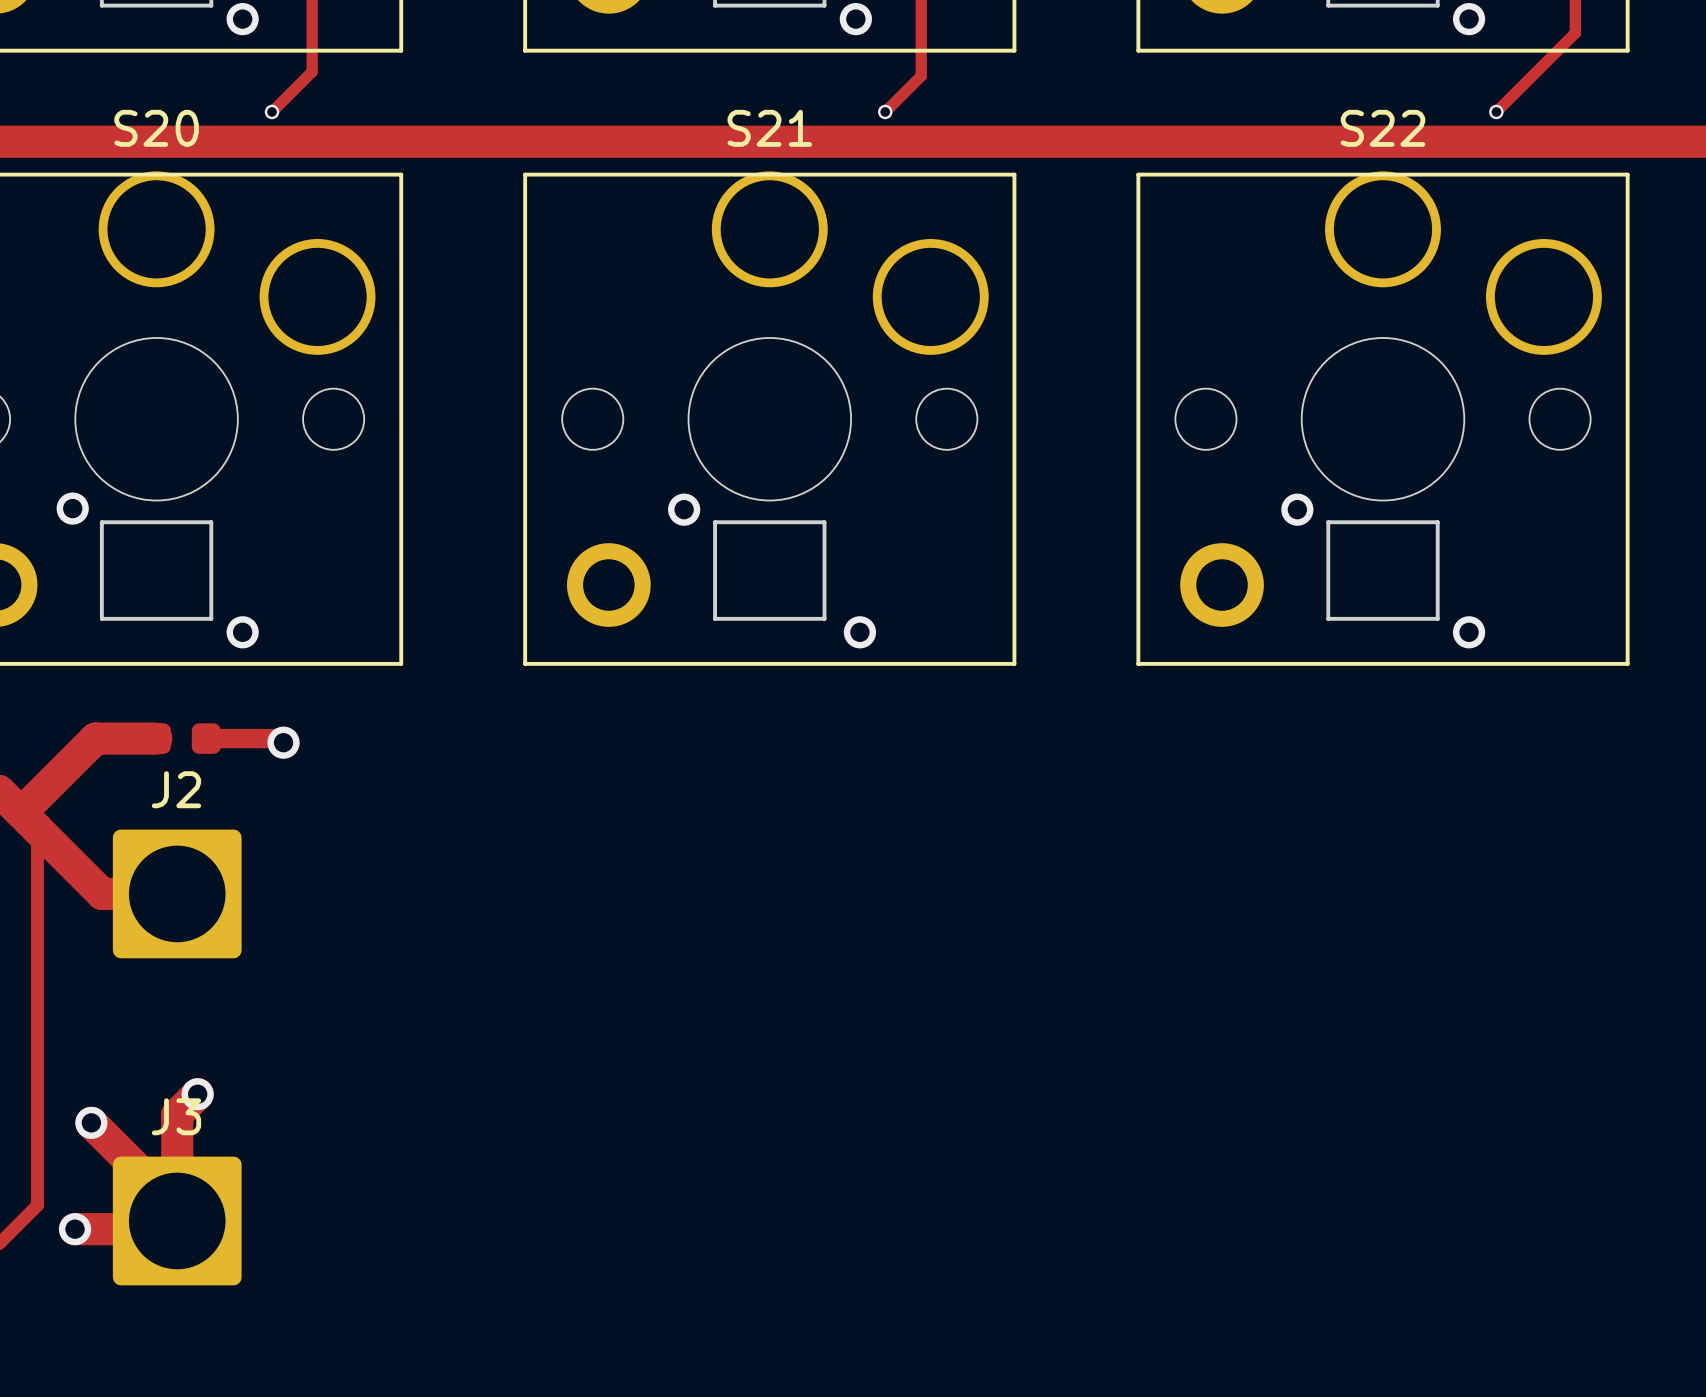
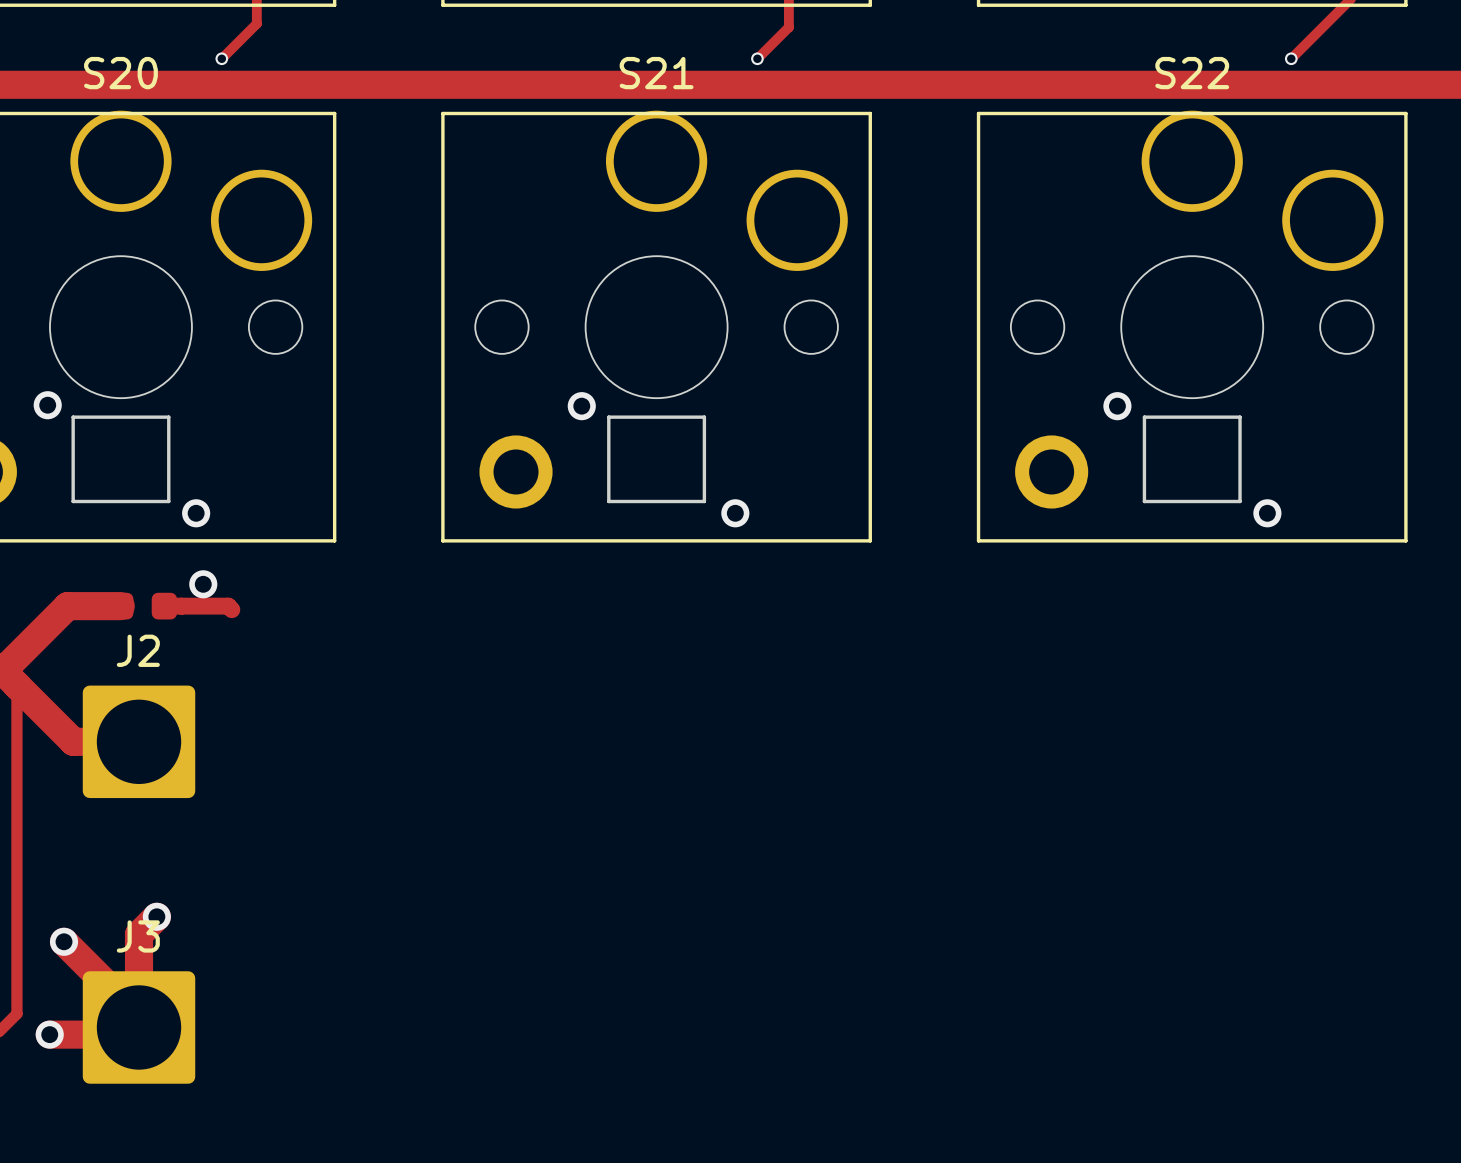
via position: (283, 742) -> (203, 584)

